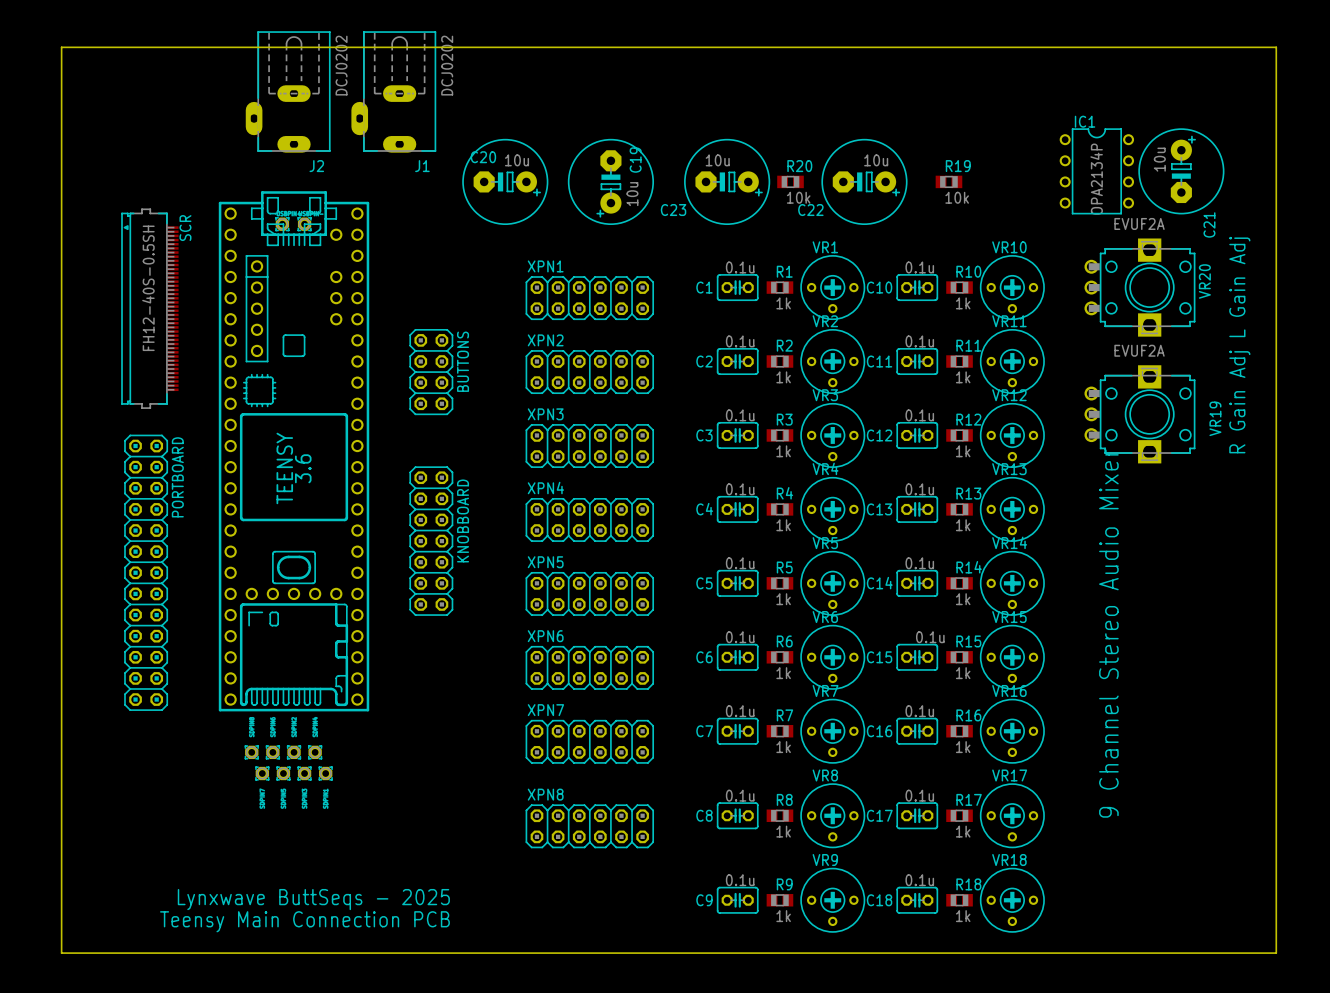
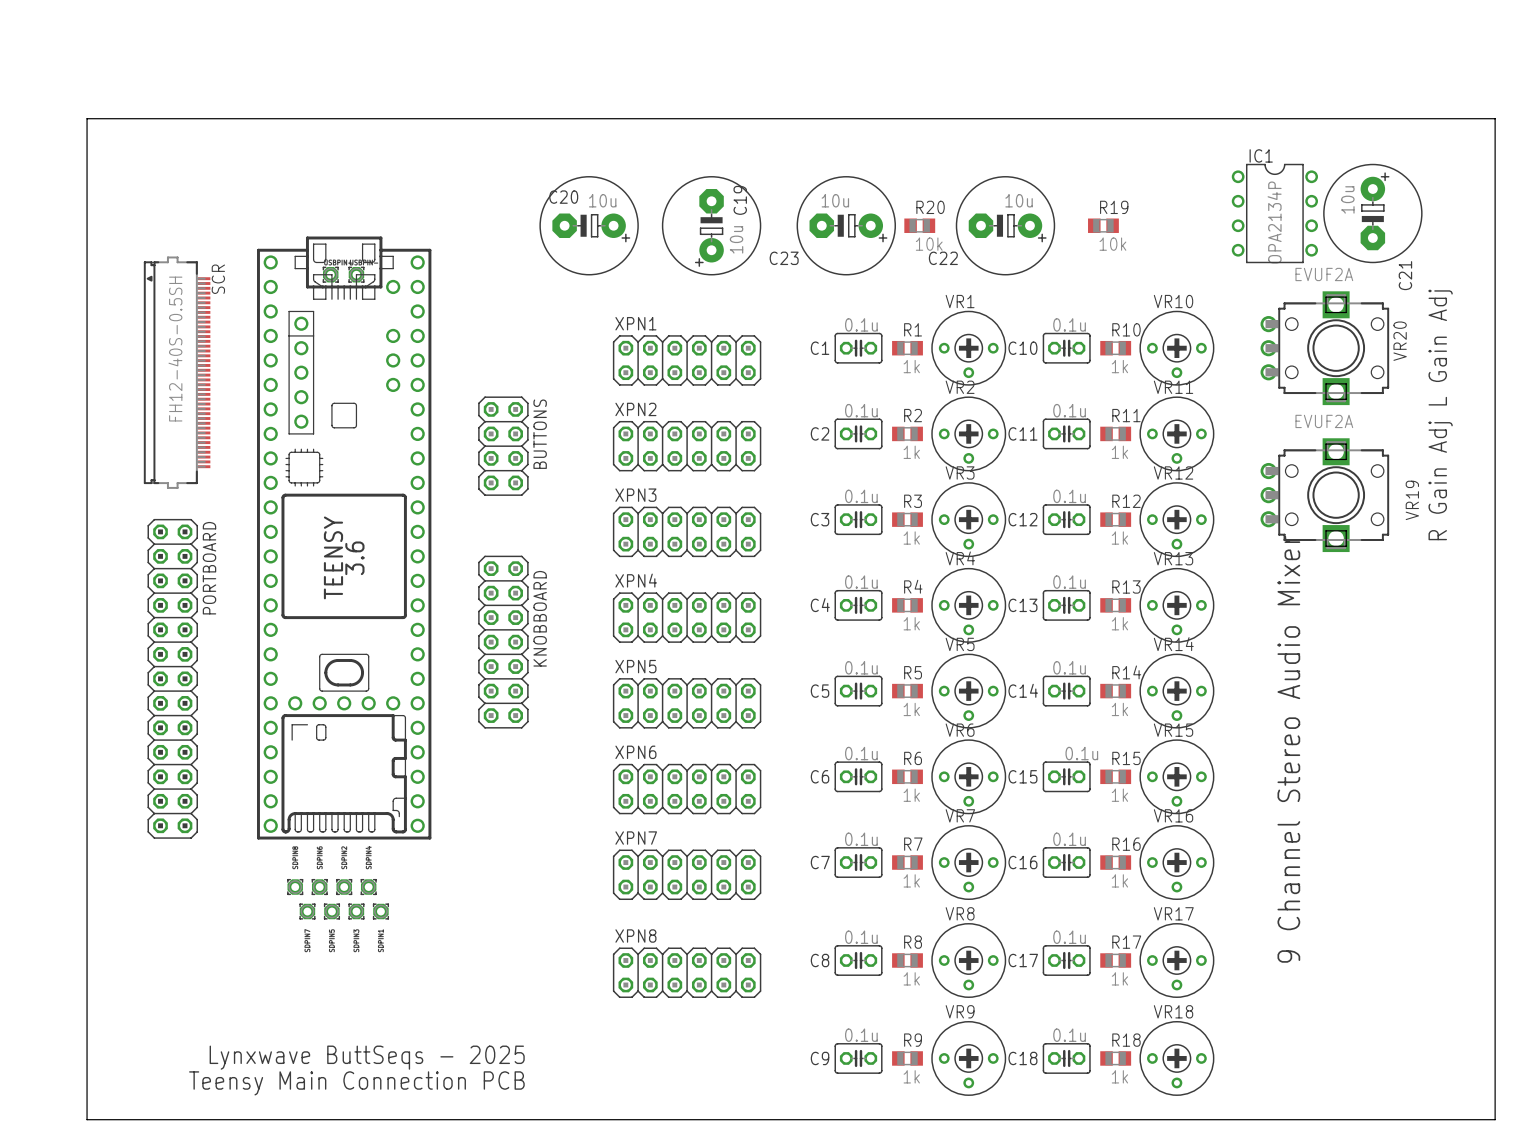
J2: DCJ0202 (288, 91) -> none
J1: DCJ0202 (393, 91) -> none
board edge: (72, 953) (61, 953) (61, 47) (1276, 47) (1276, 953) -> (87, 1119) (87, 118) (1495, 118) (1495, 1119) (1482, 1119)

